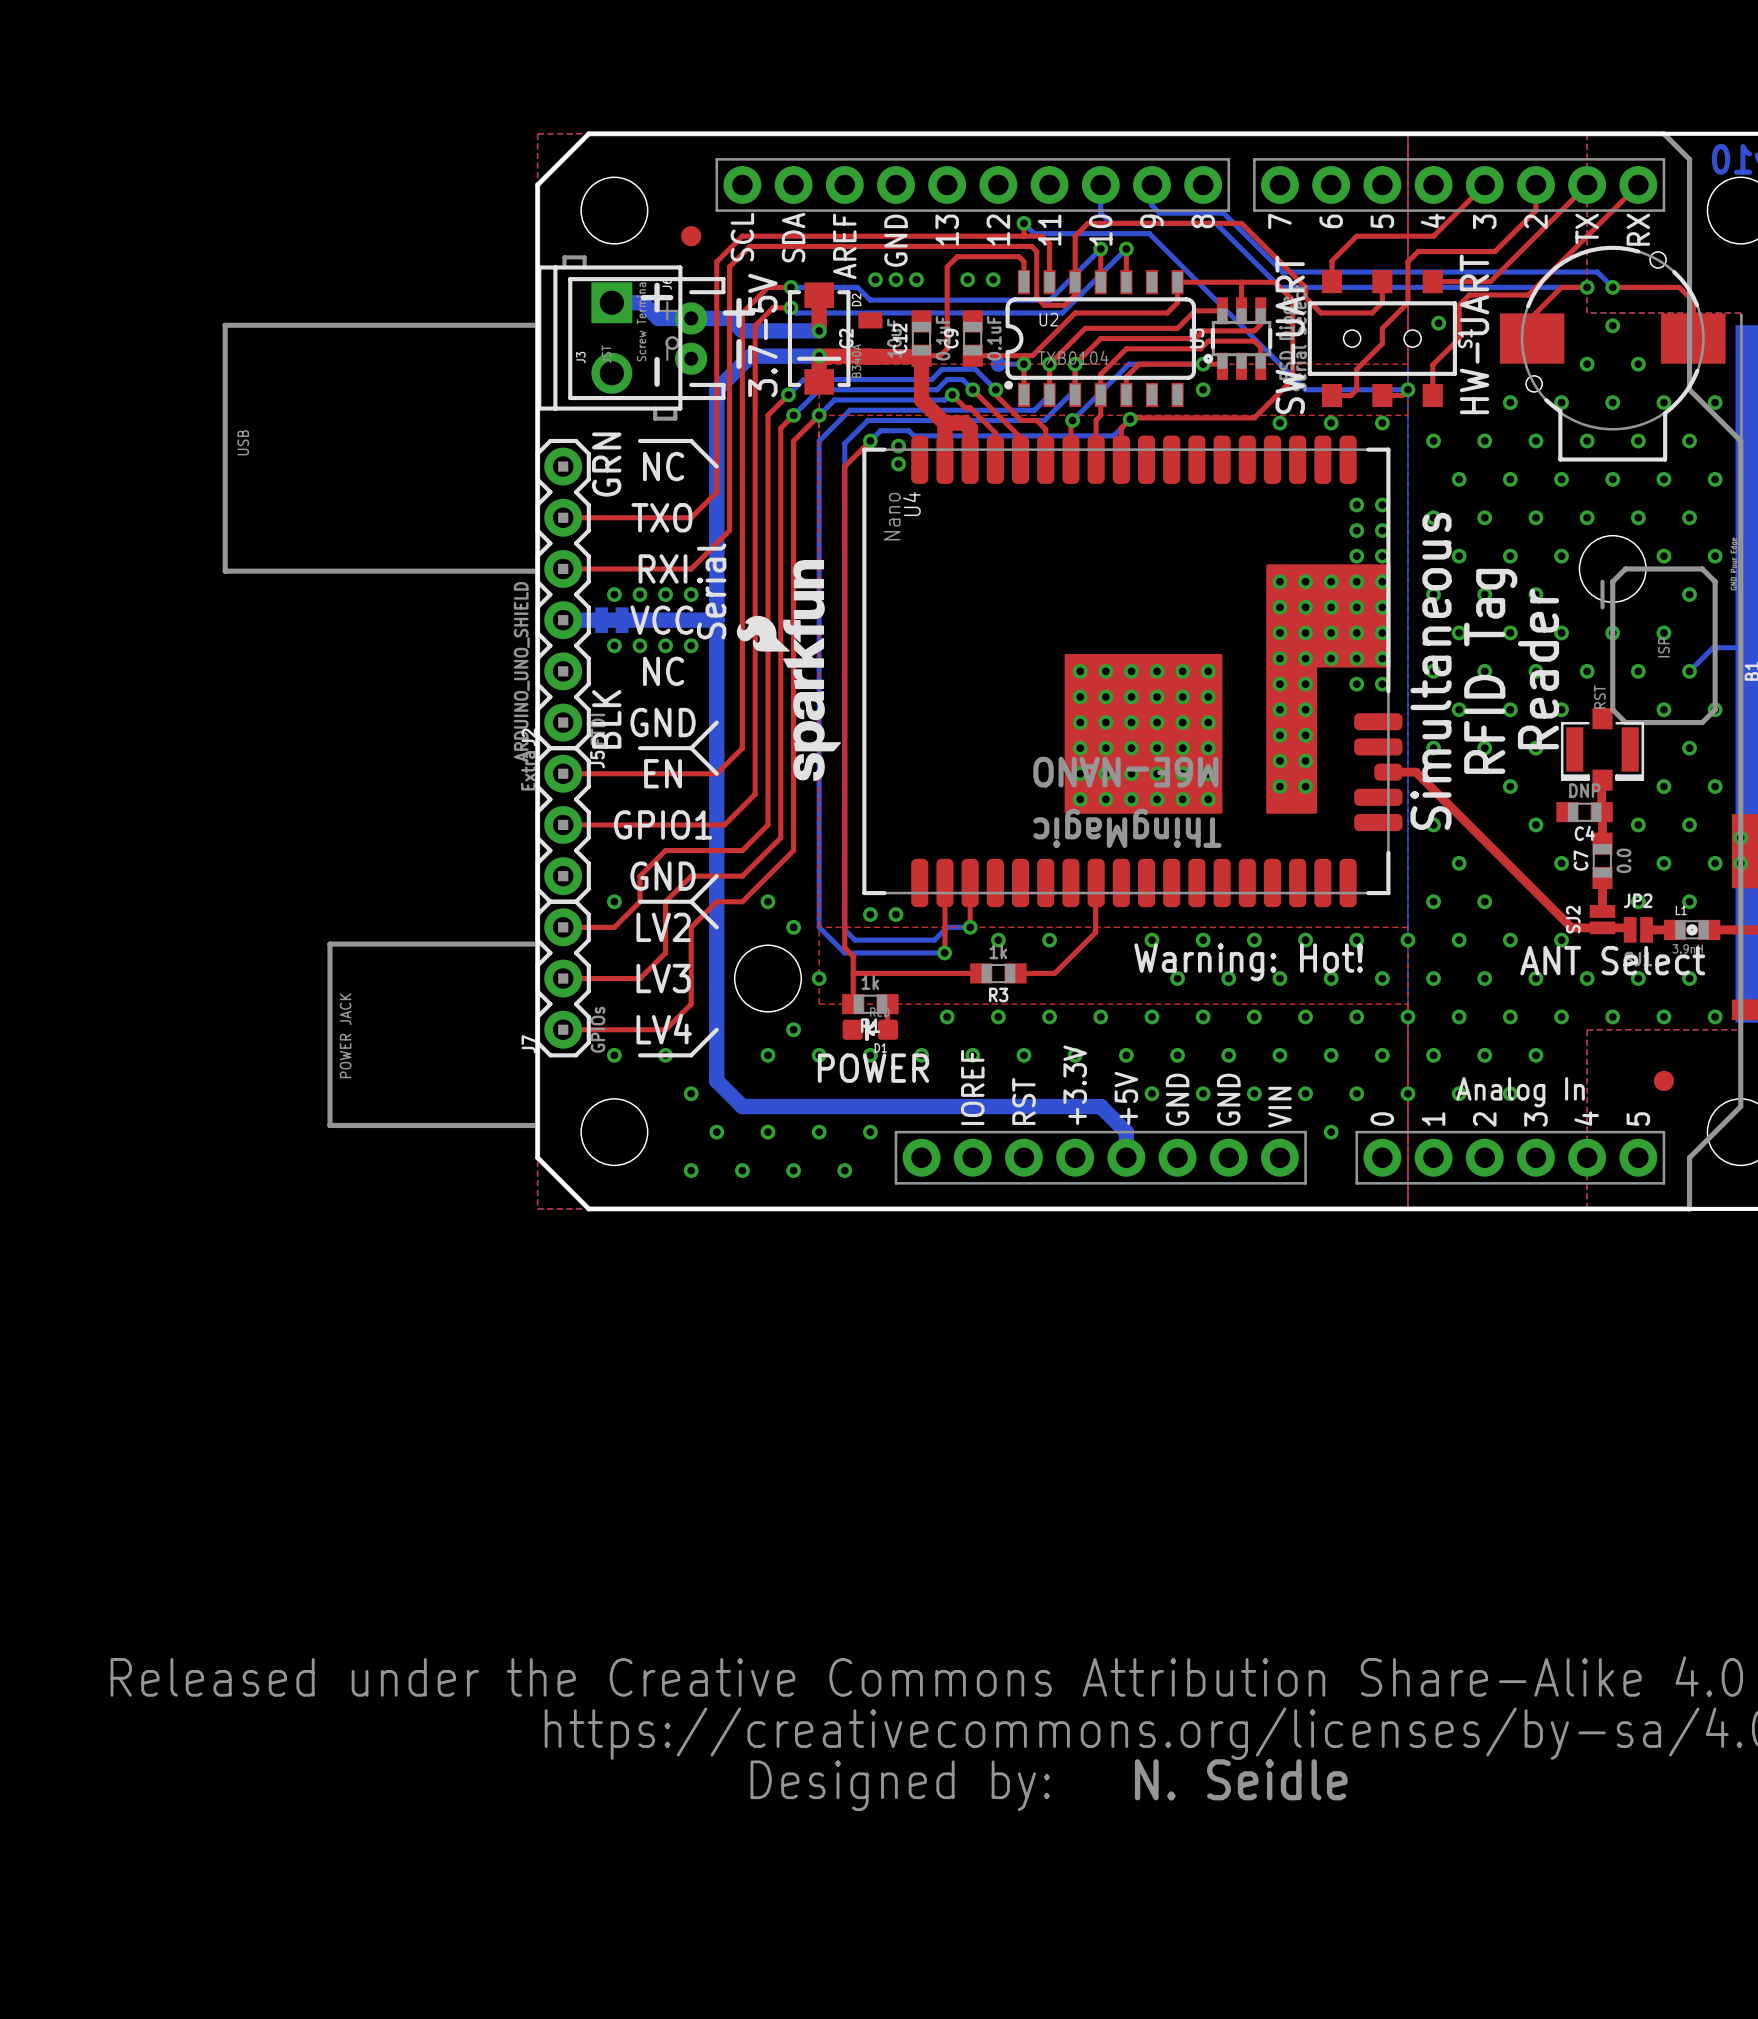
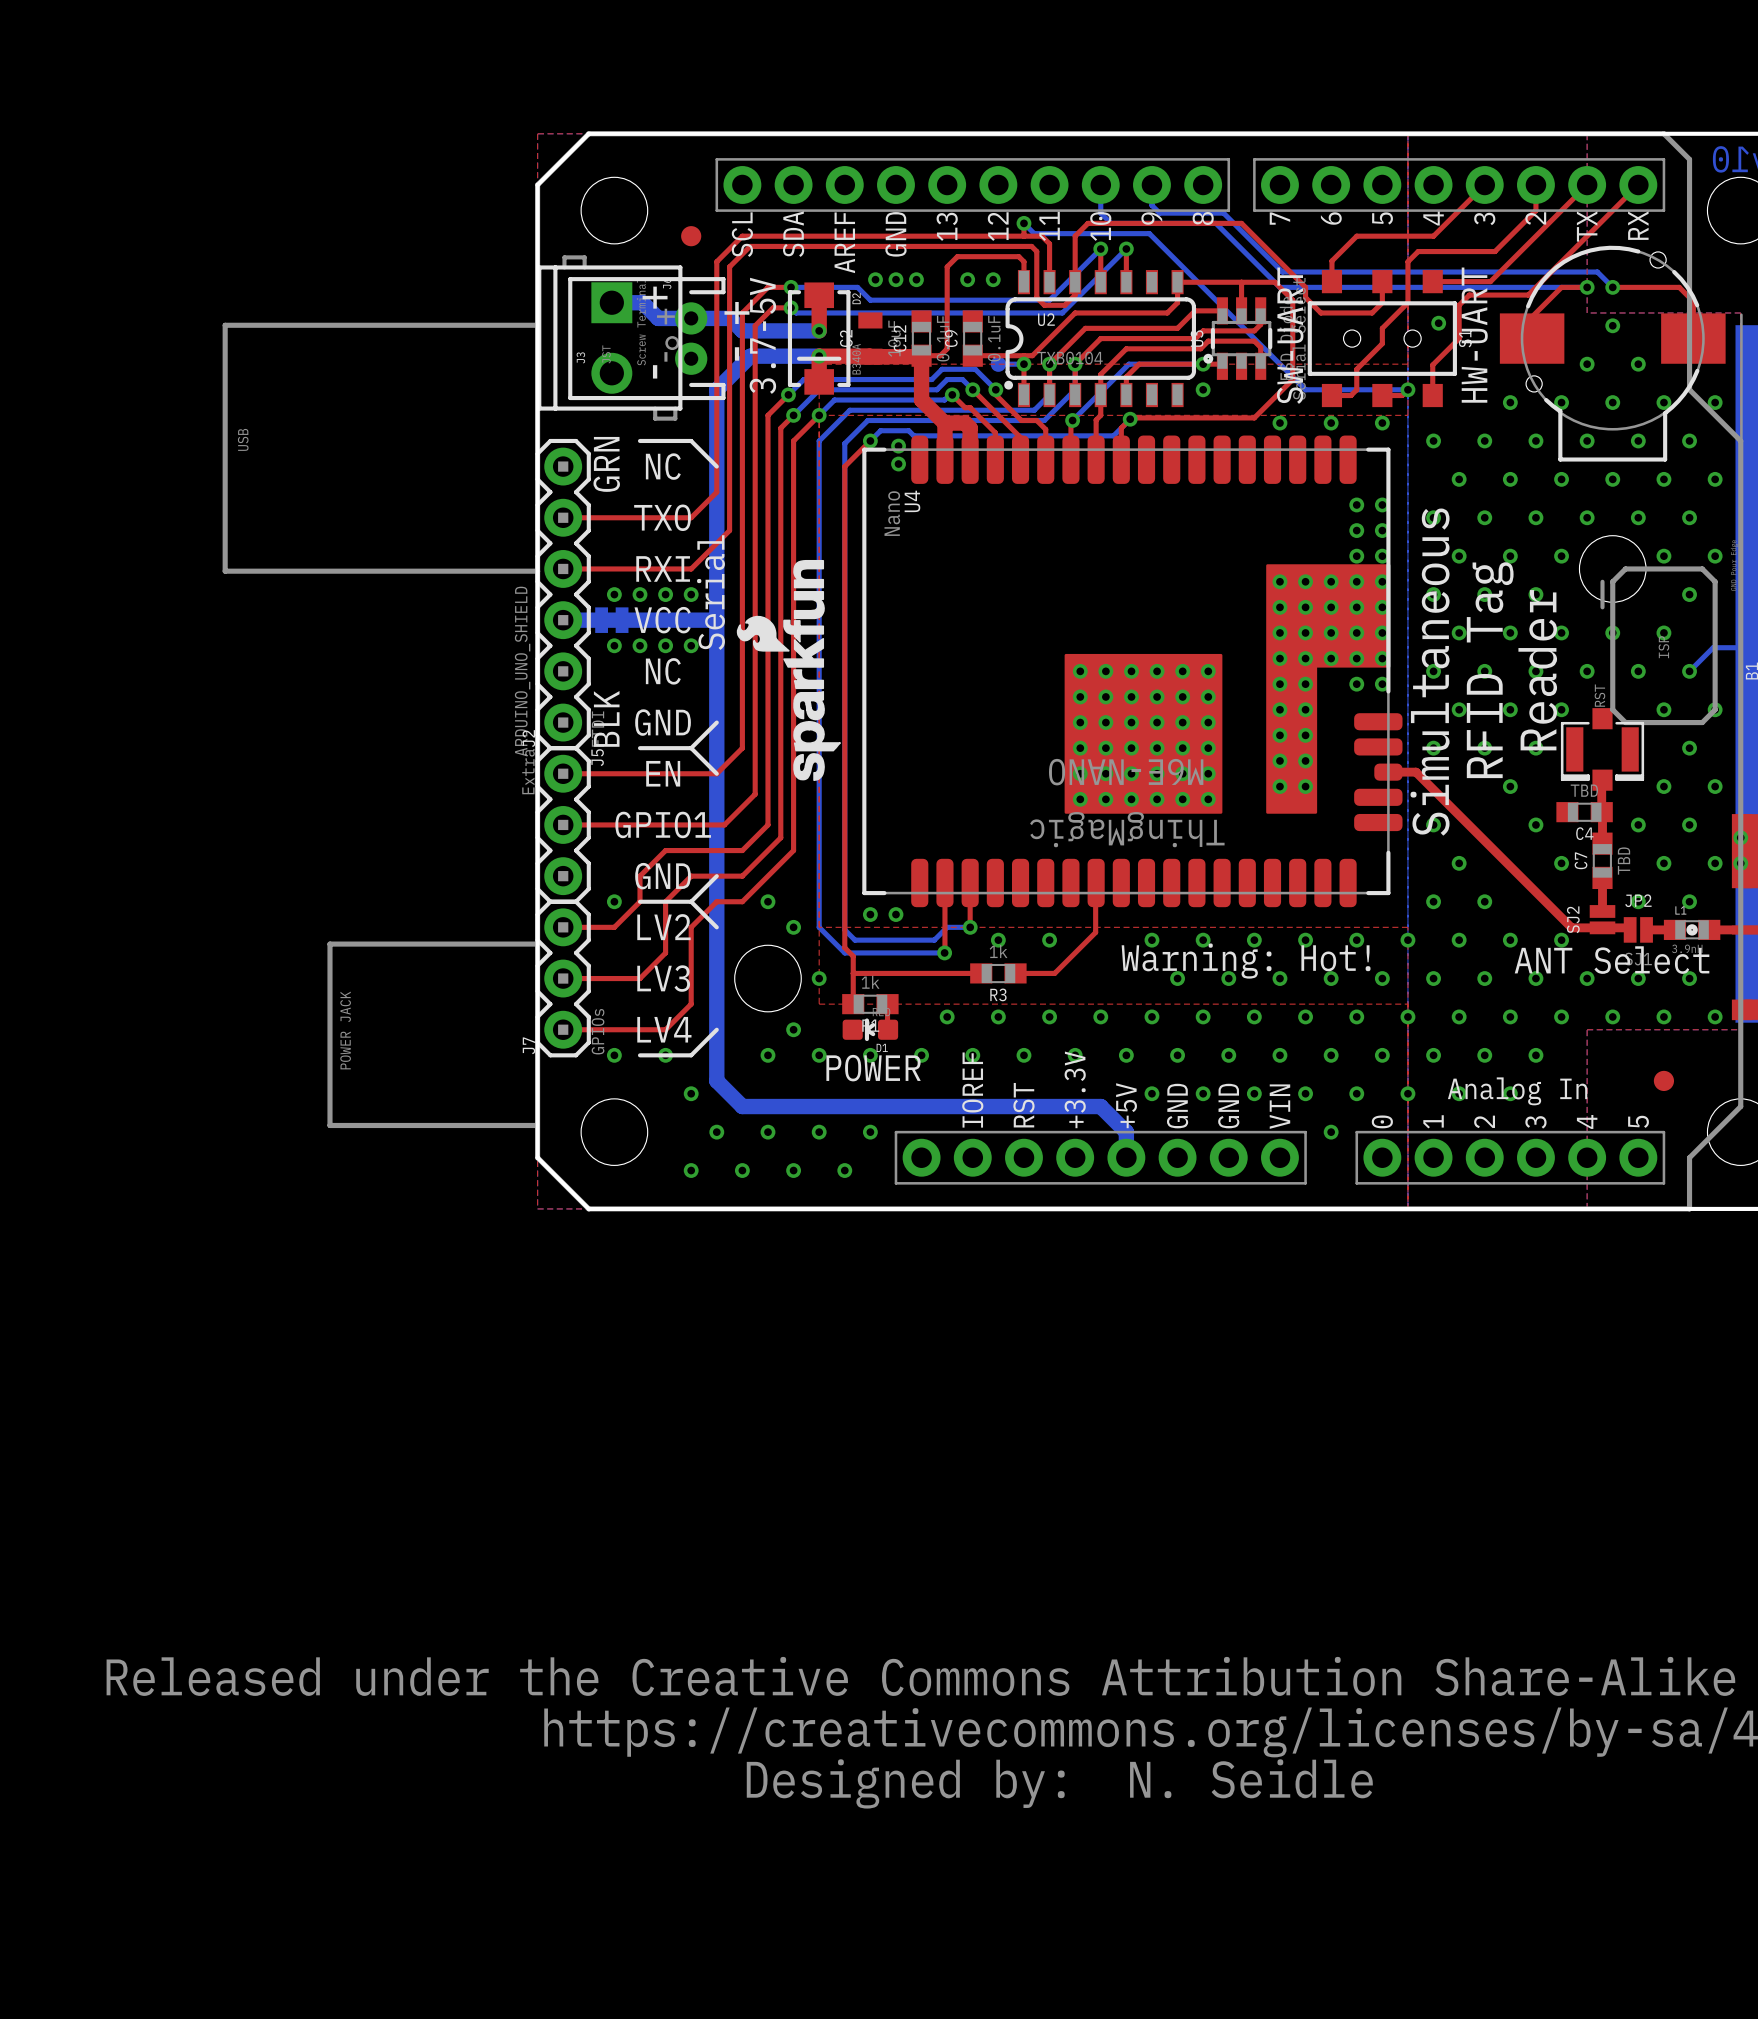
C4 value: DNP (1584, 790) -> TBD (1584, 790)
C7 value: 0.0 (1624, 860) -> TBD (1624, 861)

